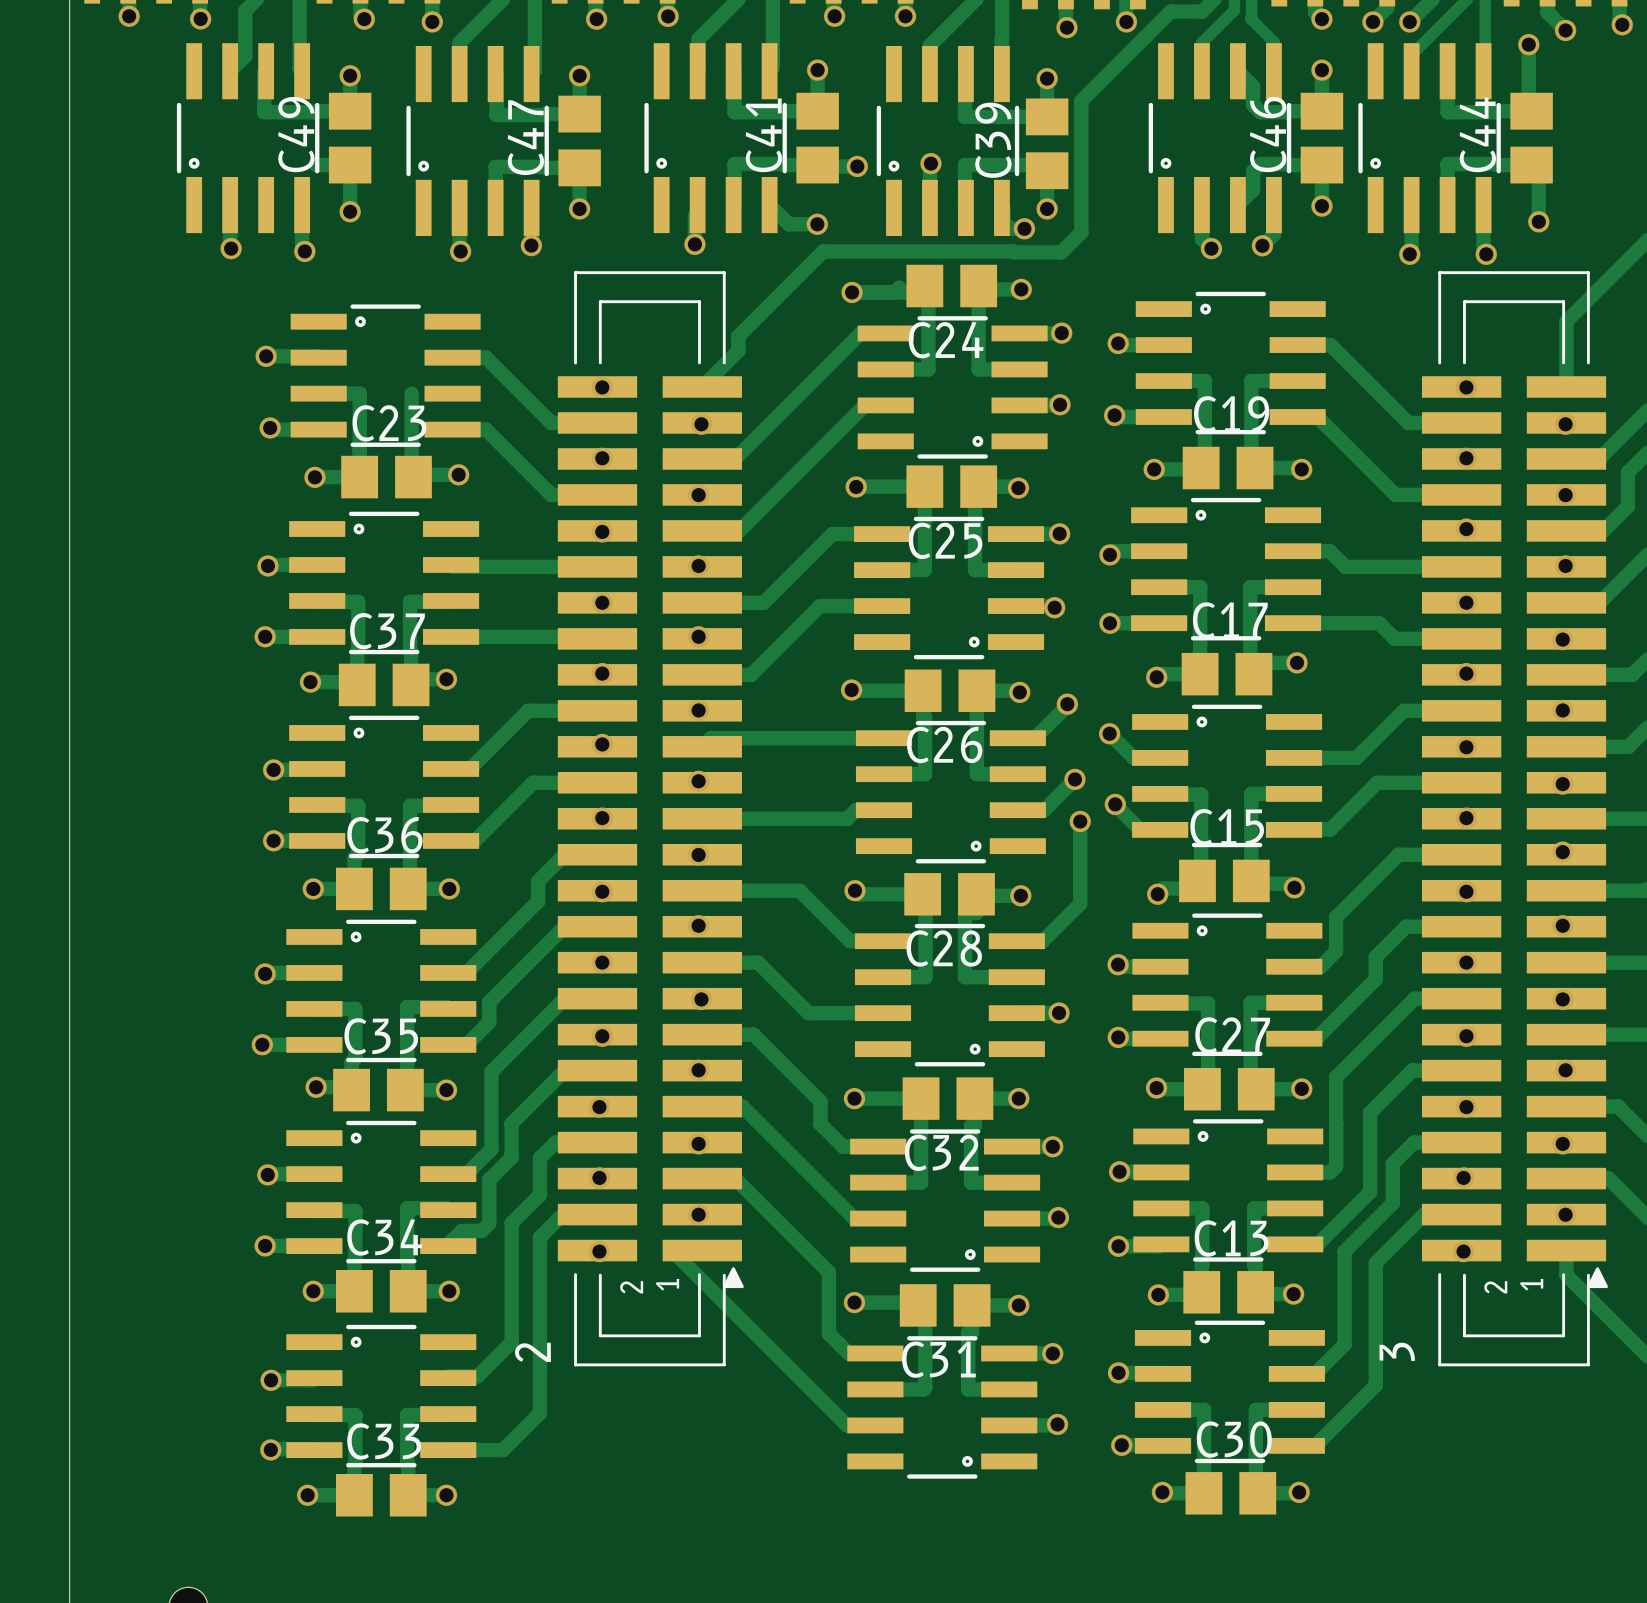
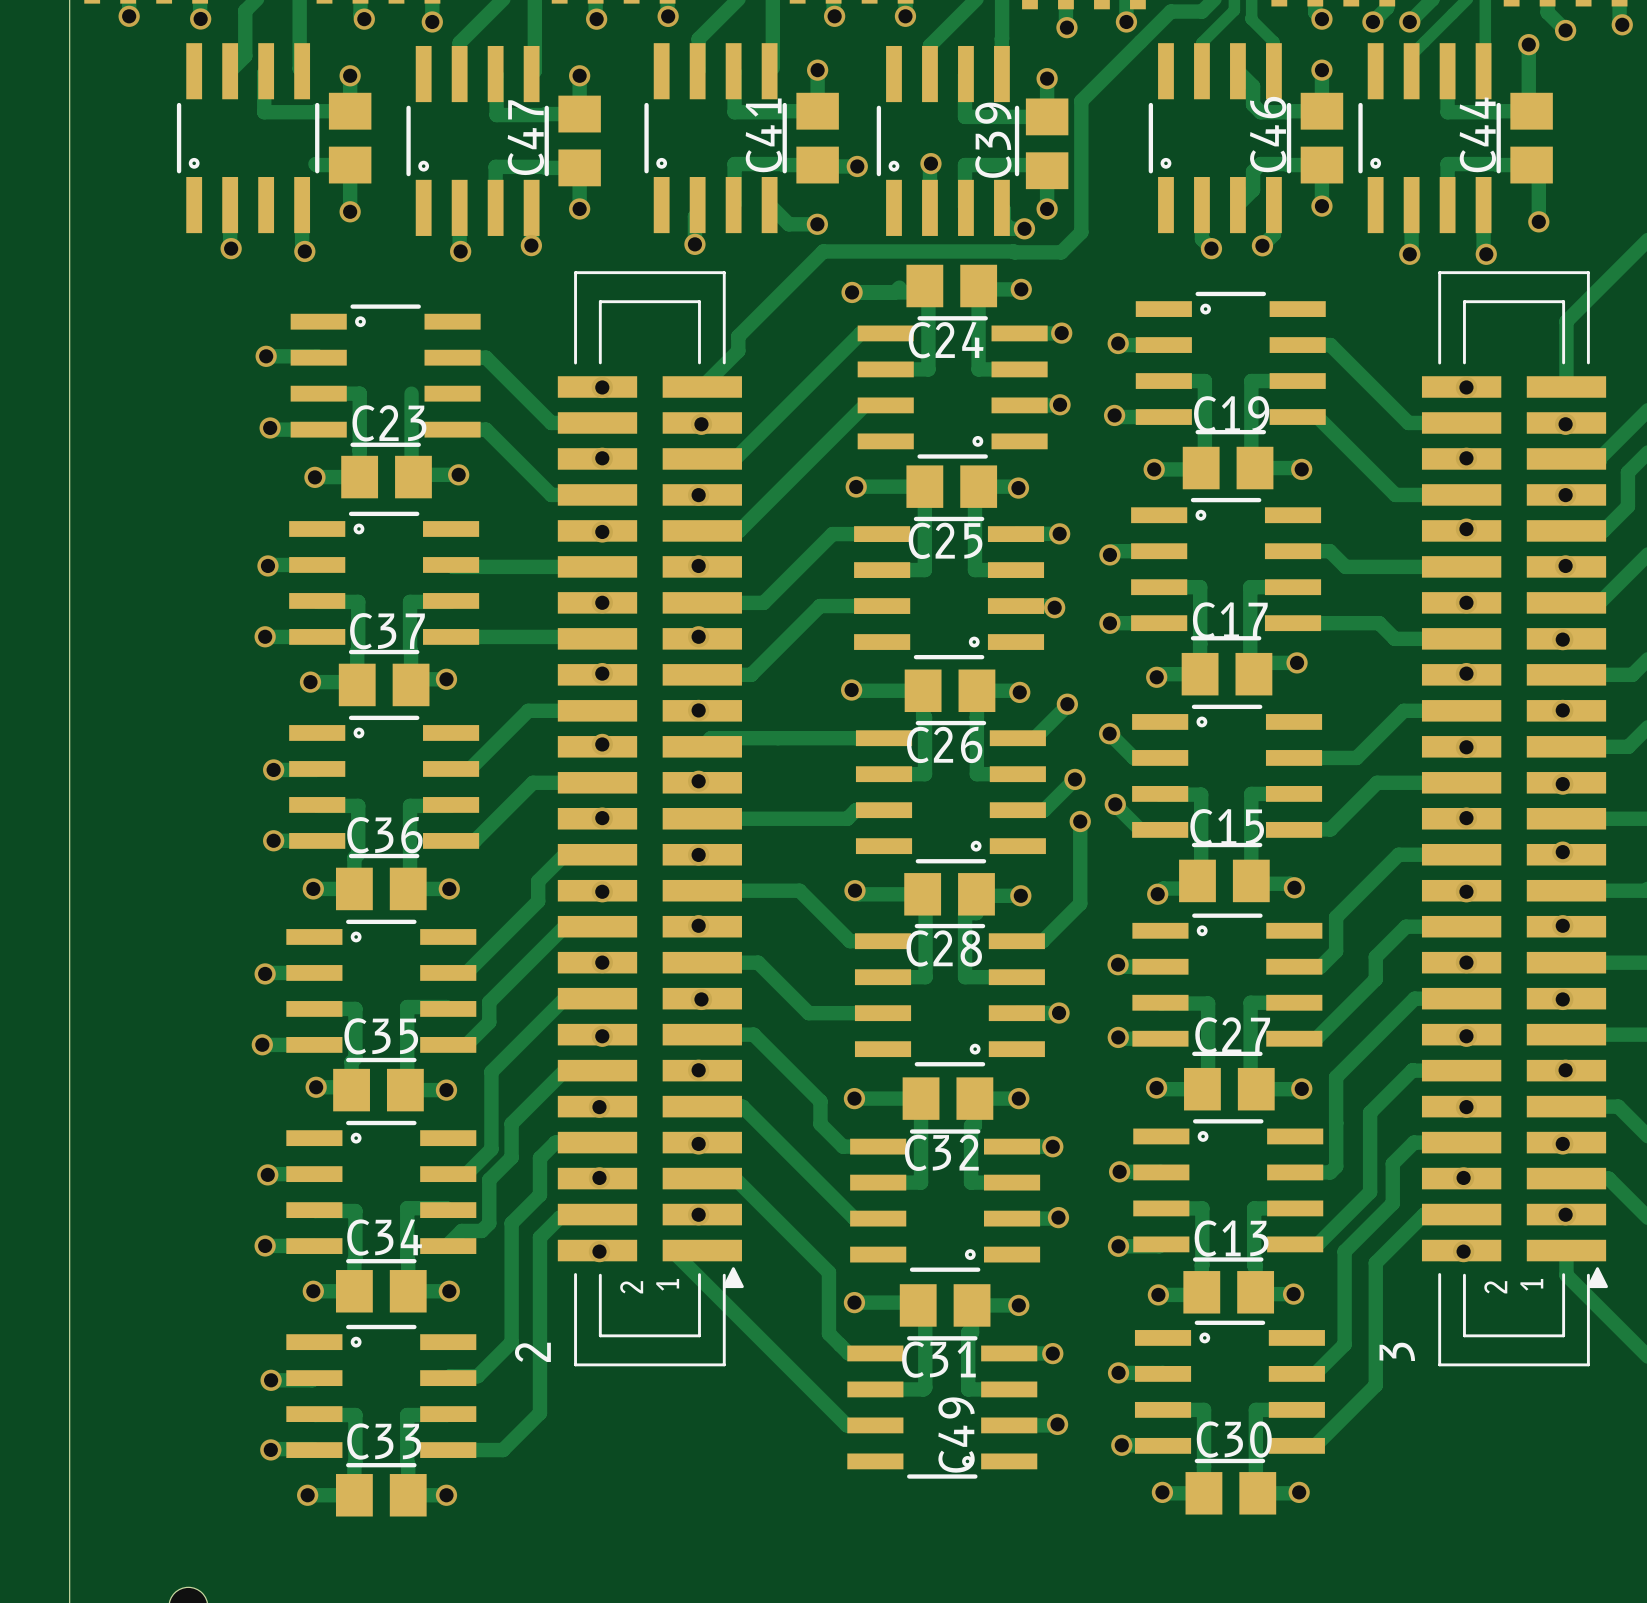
C49 name position: C49 (296, 134) -> C49 (956, 1435)

